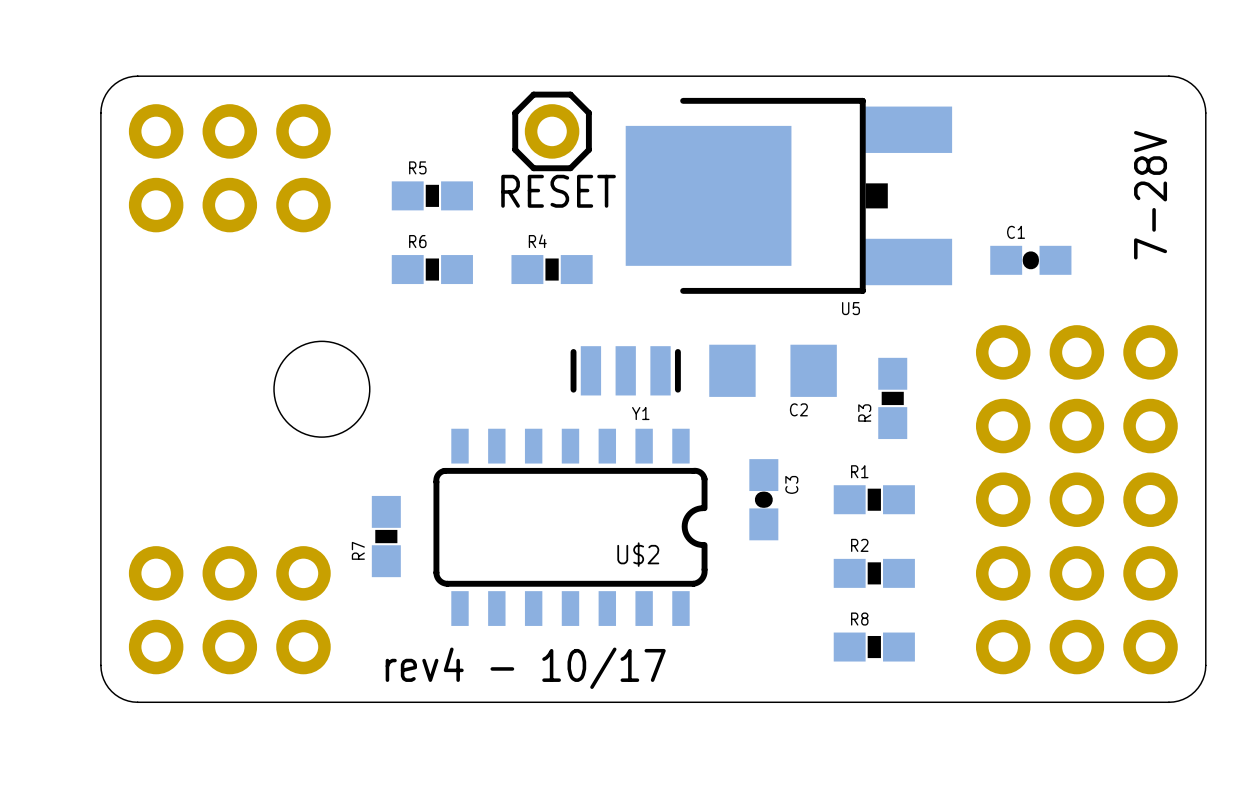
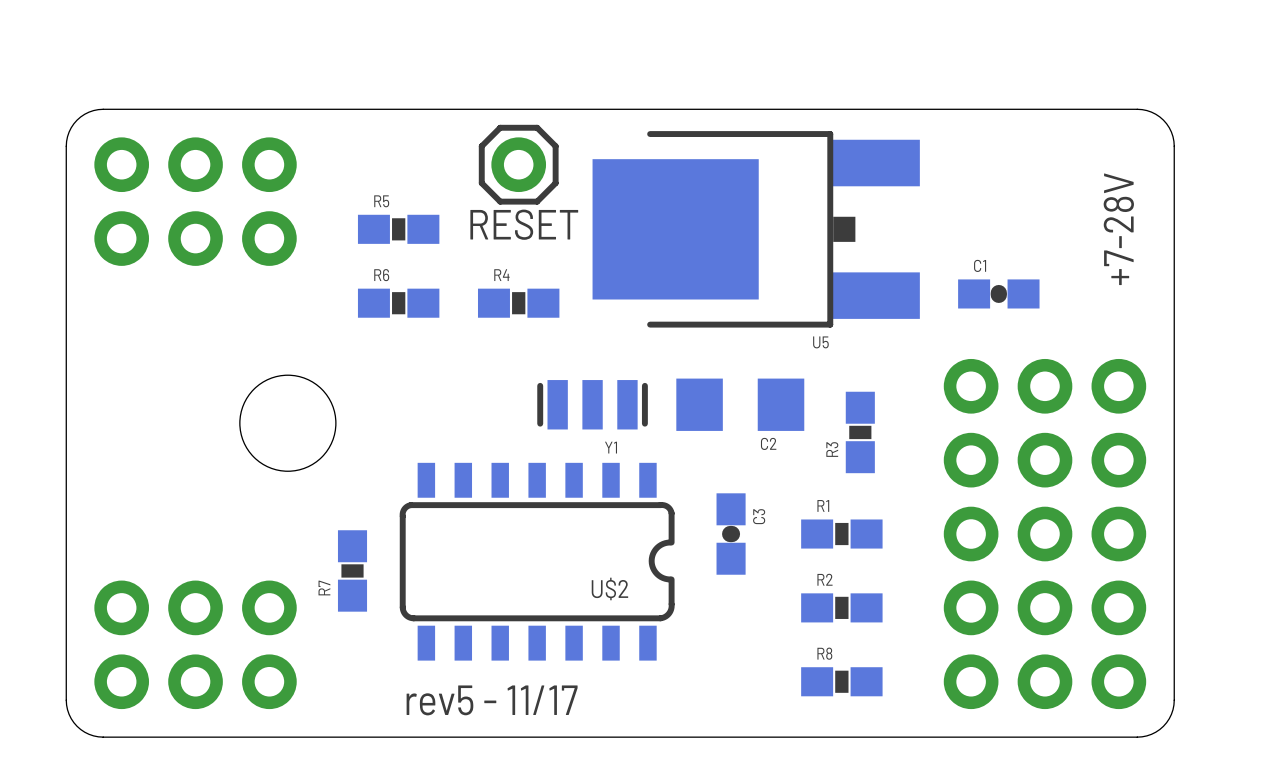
text: 7-28V (1150, 195) -> +7-28V (1118, 229)
text: rev4 - 10/17 (525, 668) -> rev5 - 11/17 (492, 700)

